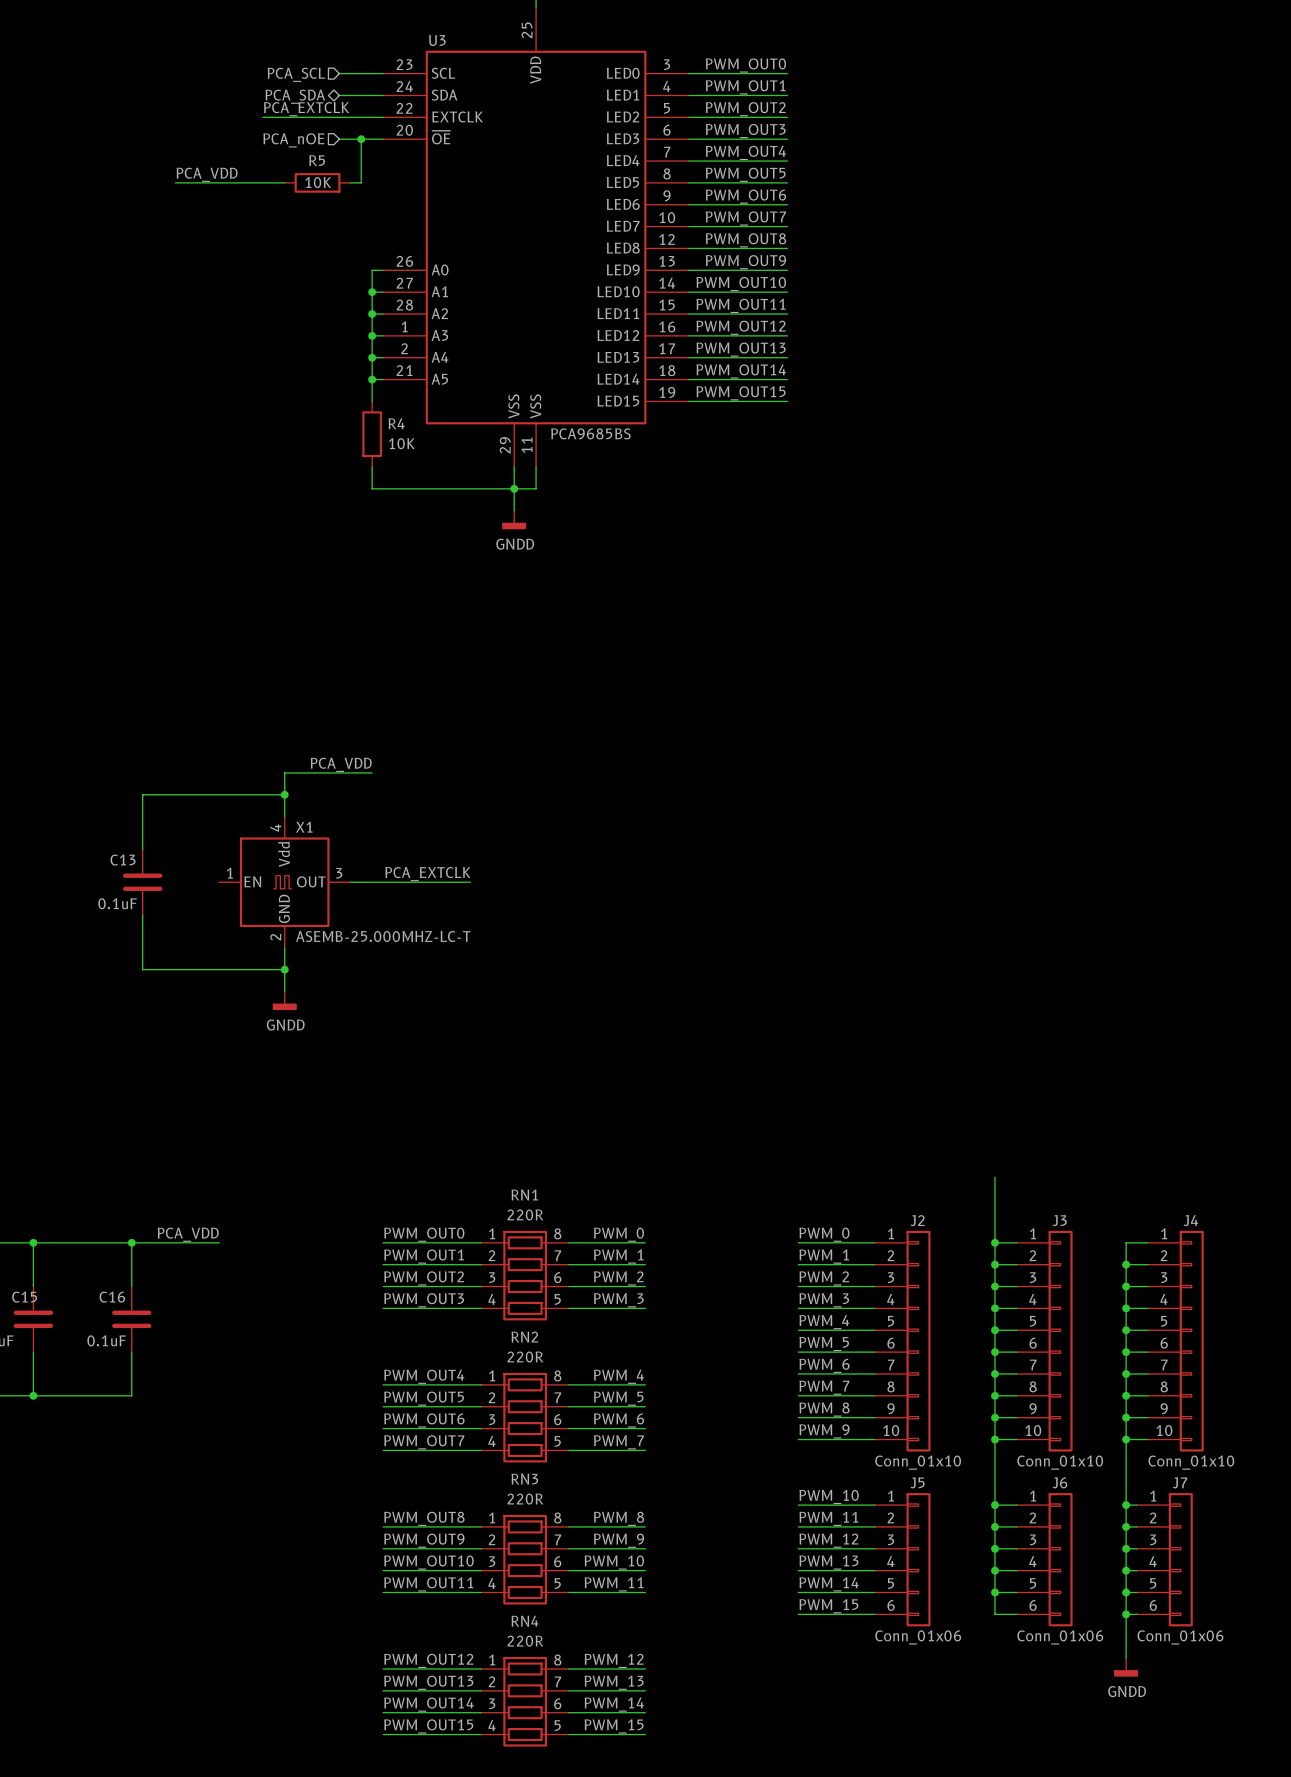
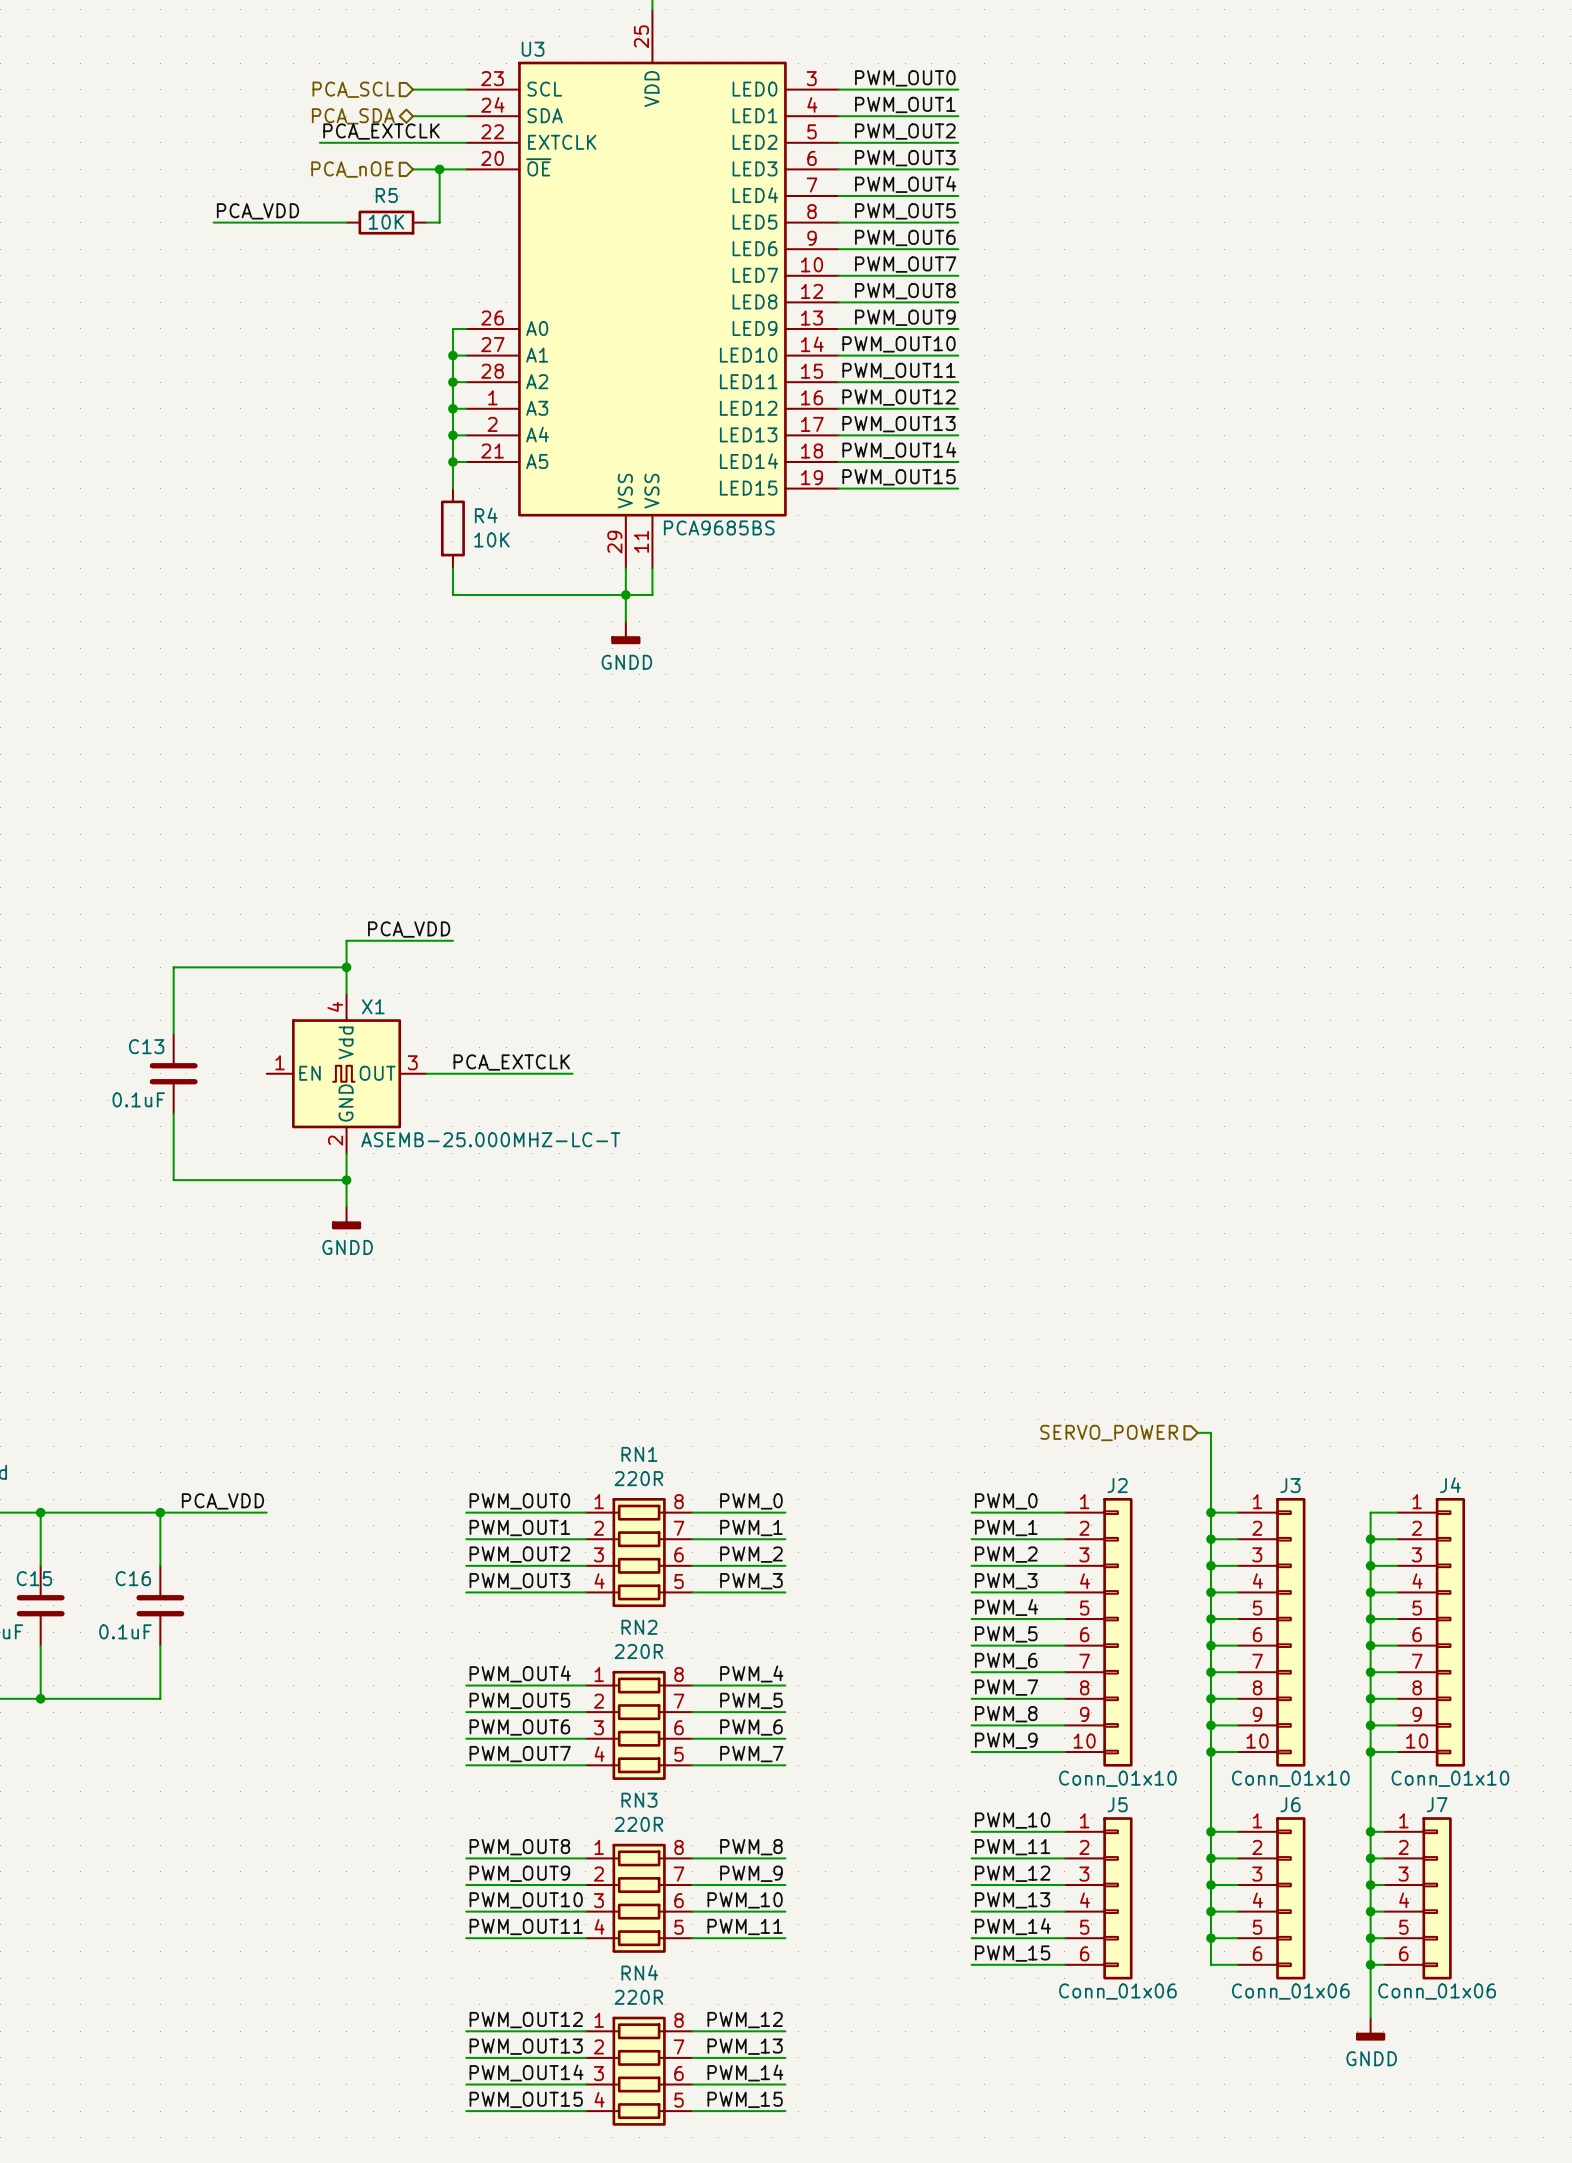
wire: none -> (1197, 1432) (1211, 1432)
hierarchical label: none -> SERVO_POWER (1109, 1432)

